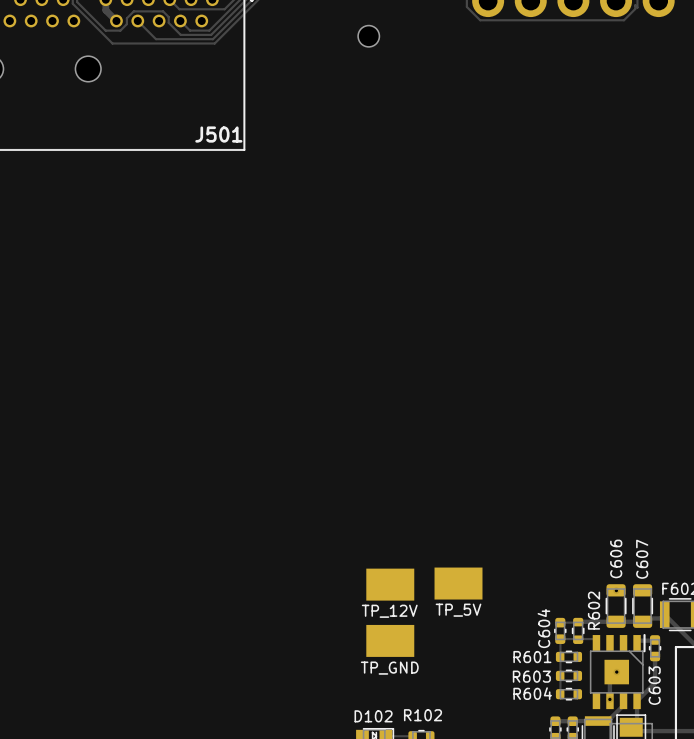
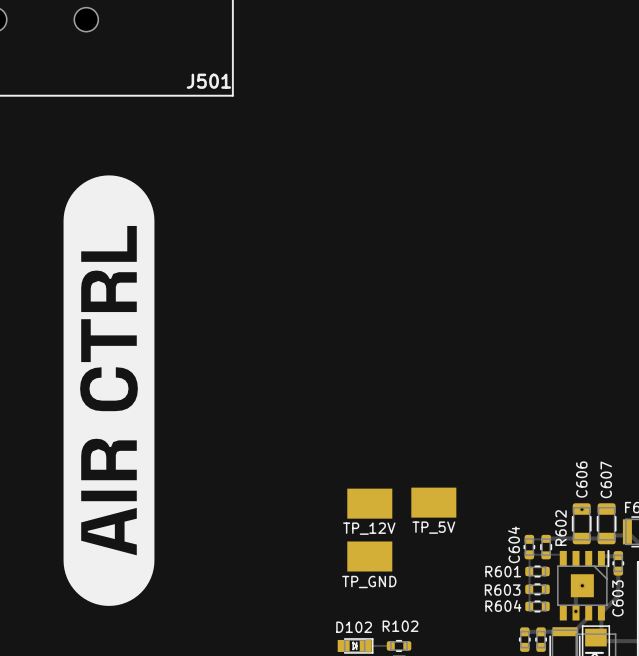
drawing: none -> [63, 175, 155, 606]

